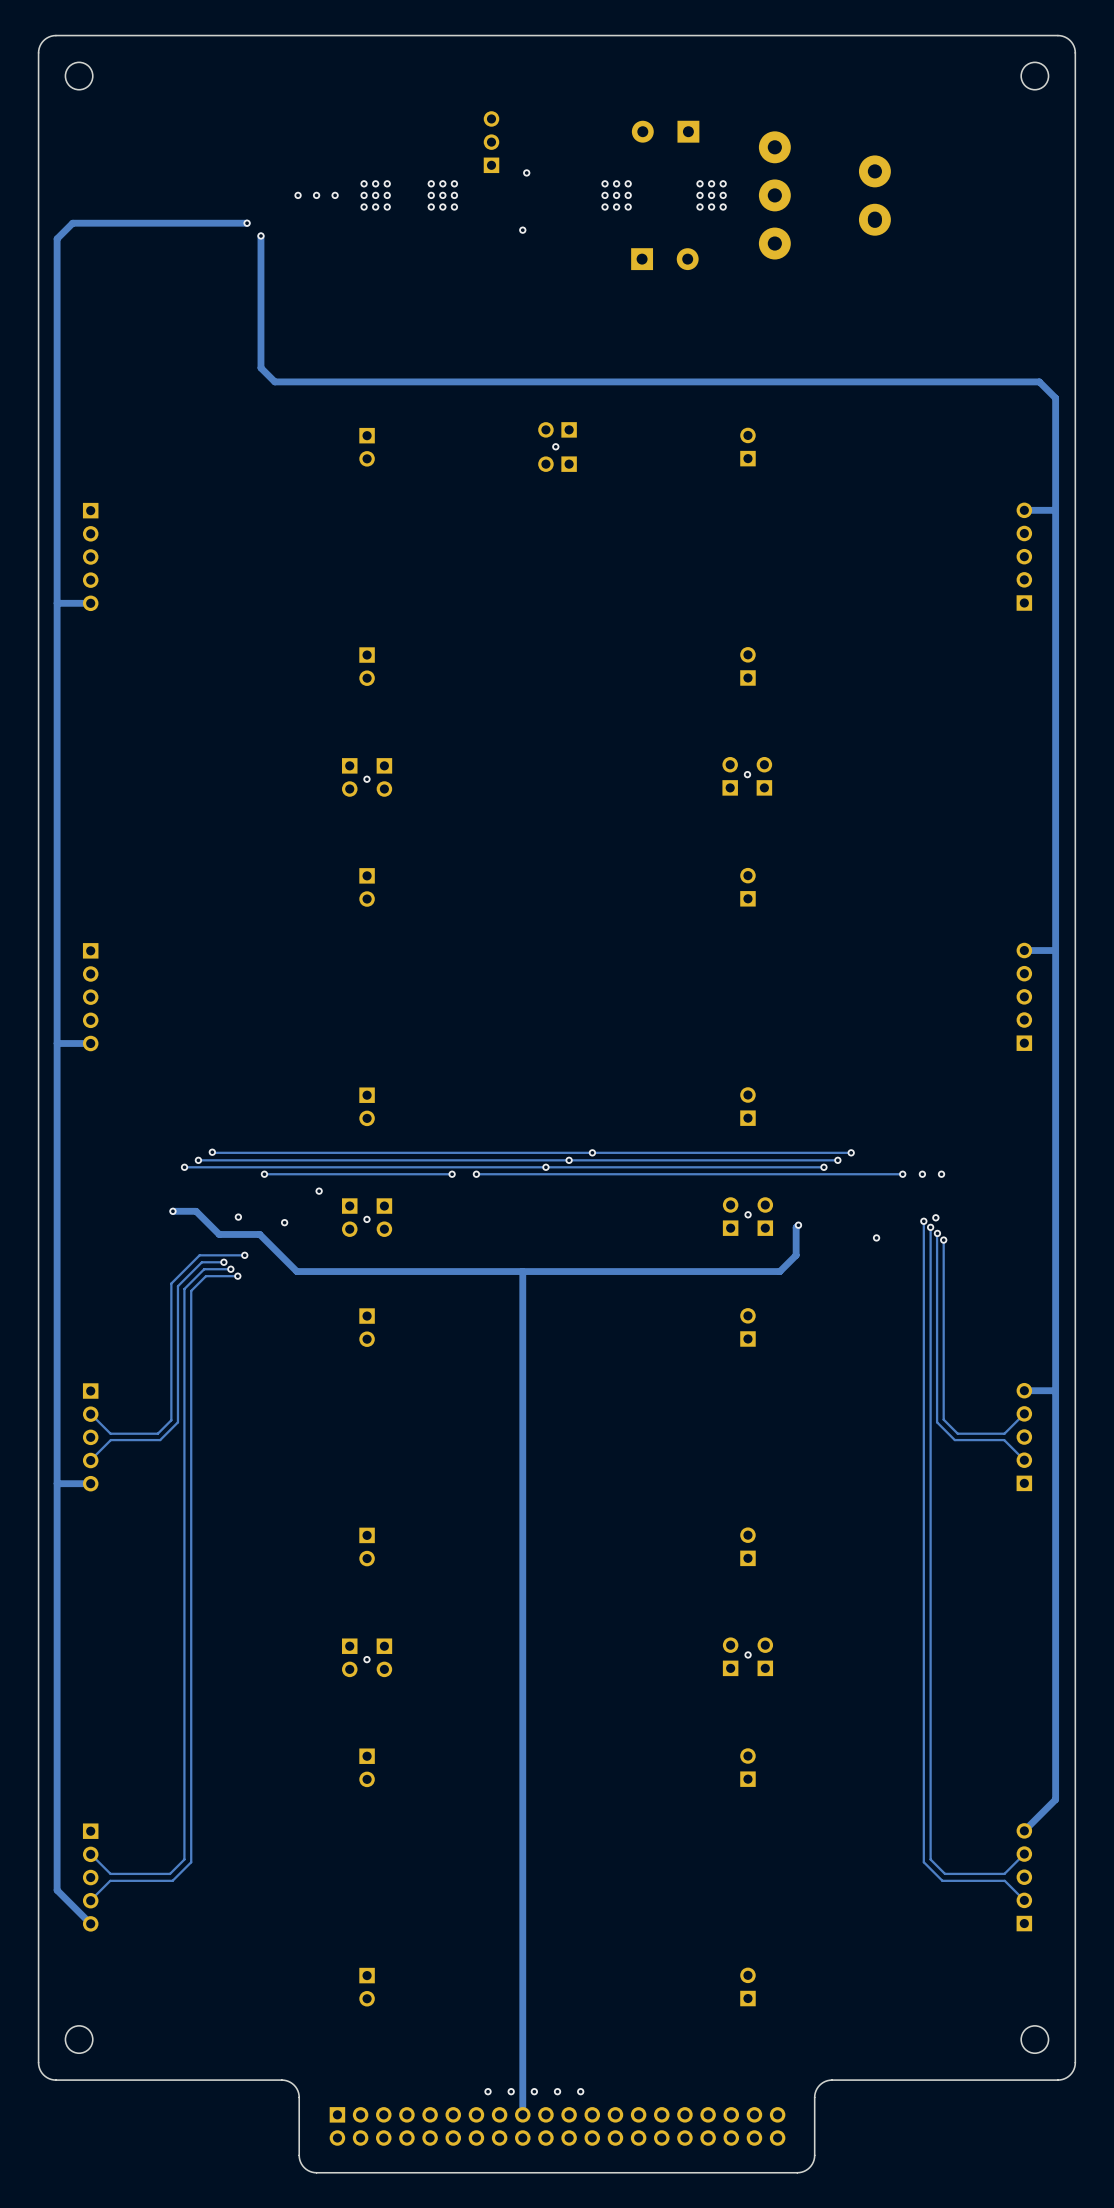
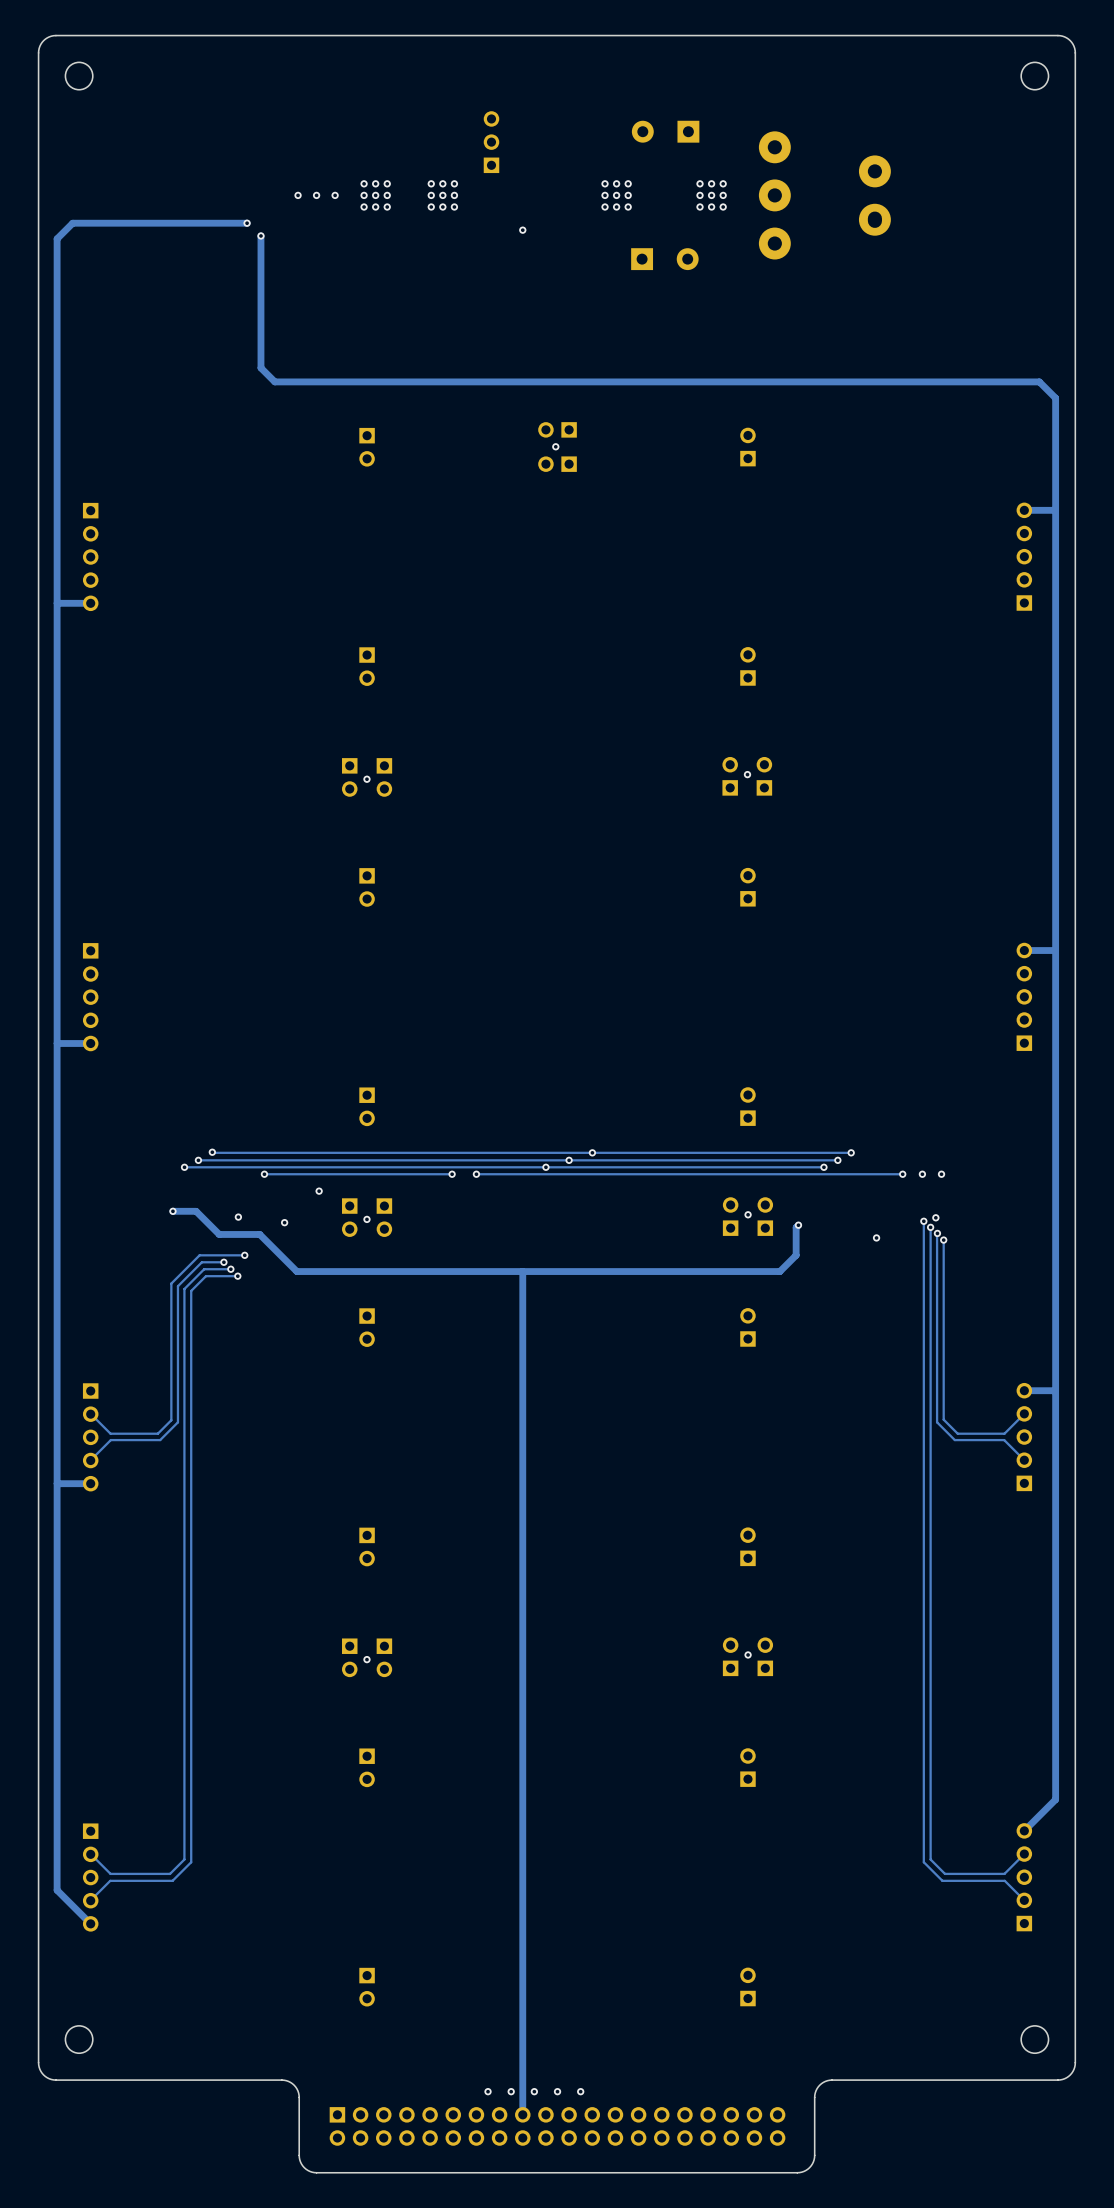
via: (526, 172) -> none

